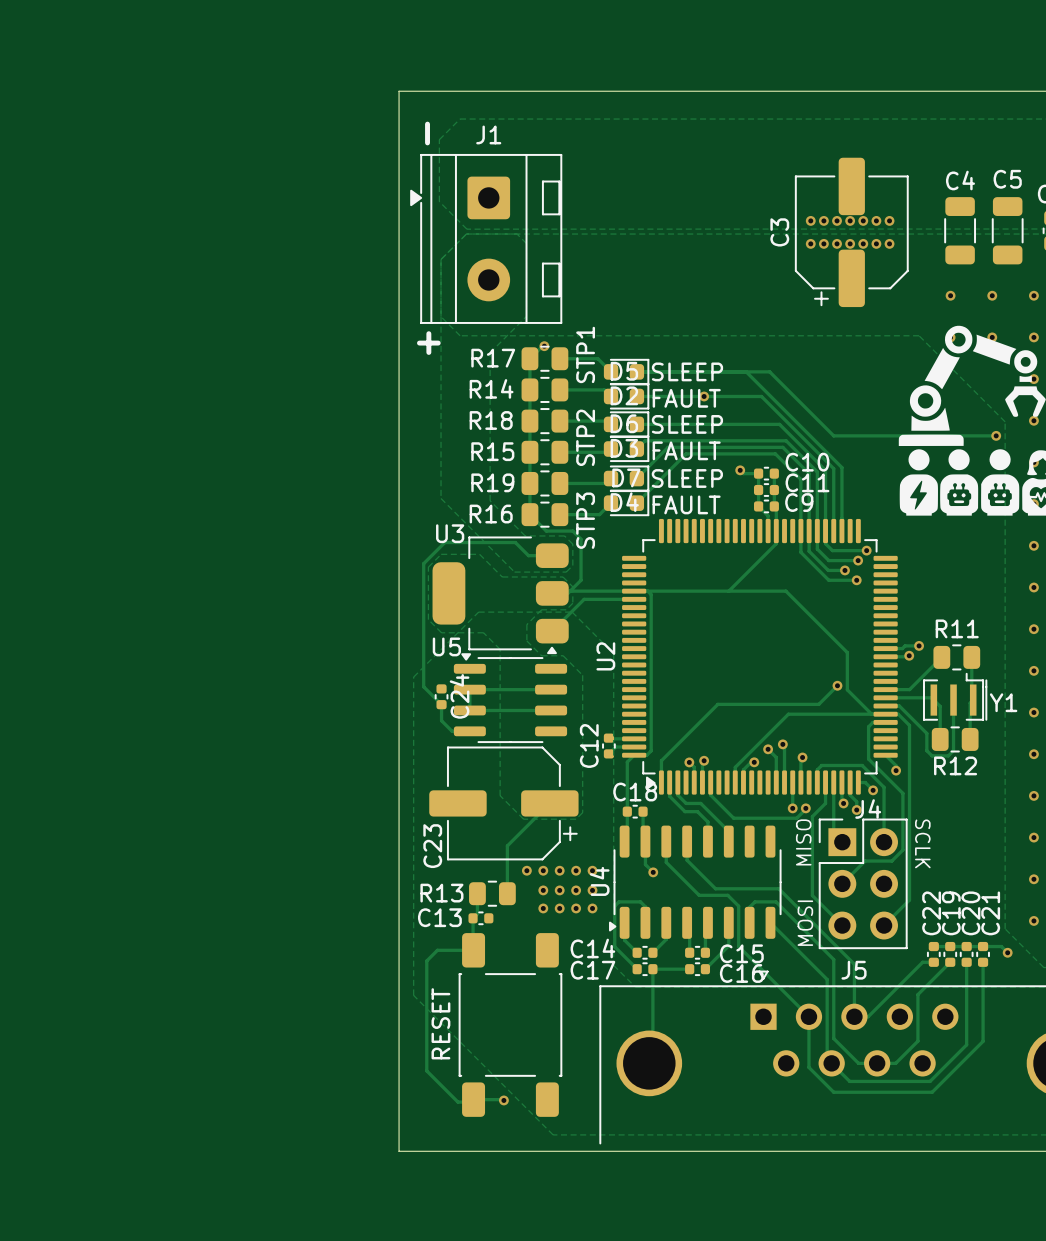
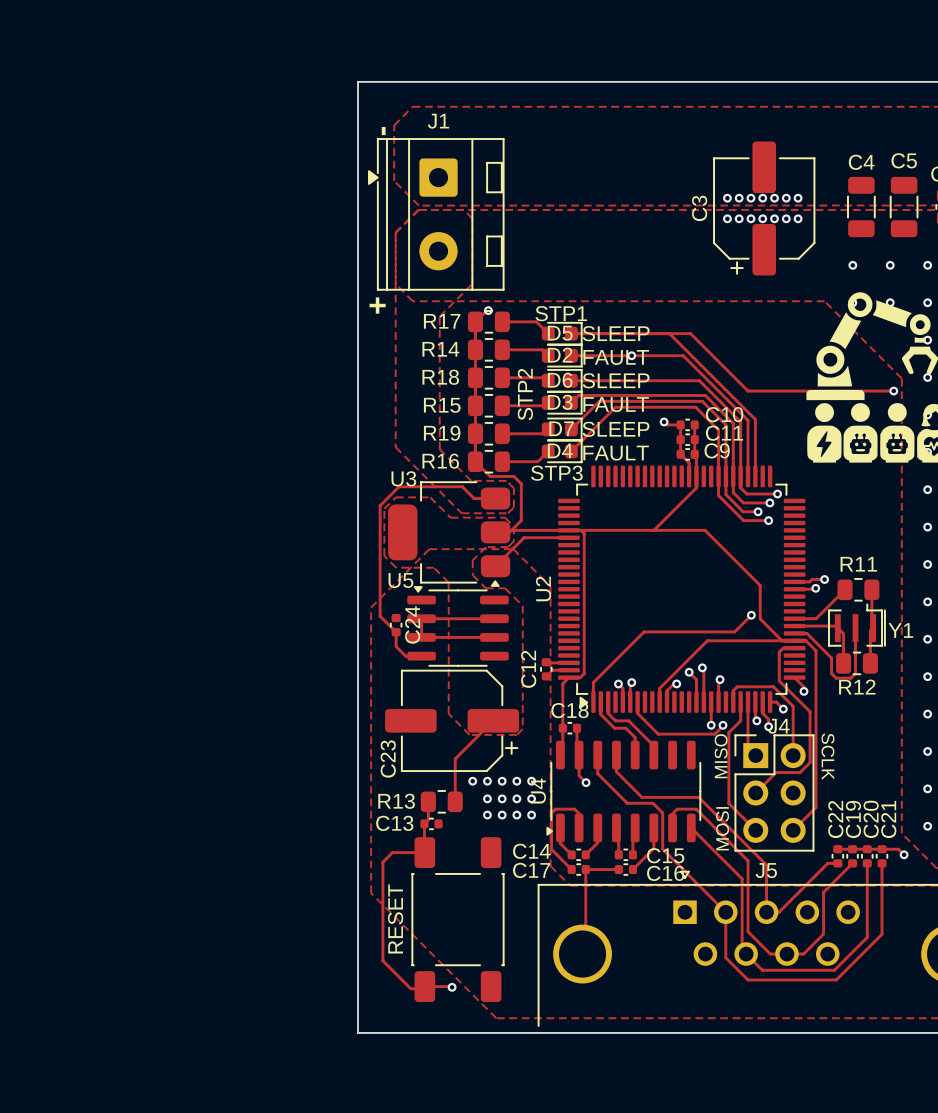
text rotation: 0° (585, 354) -> 90° clockwise (561, 313)
text rotation: 0° (585, 520) -> 90° clockwise (556, 473)

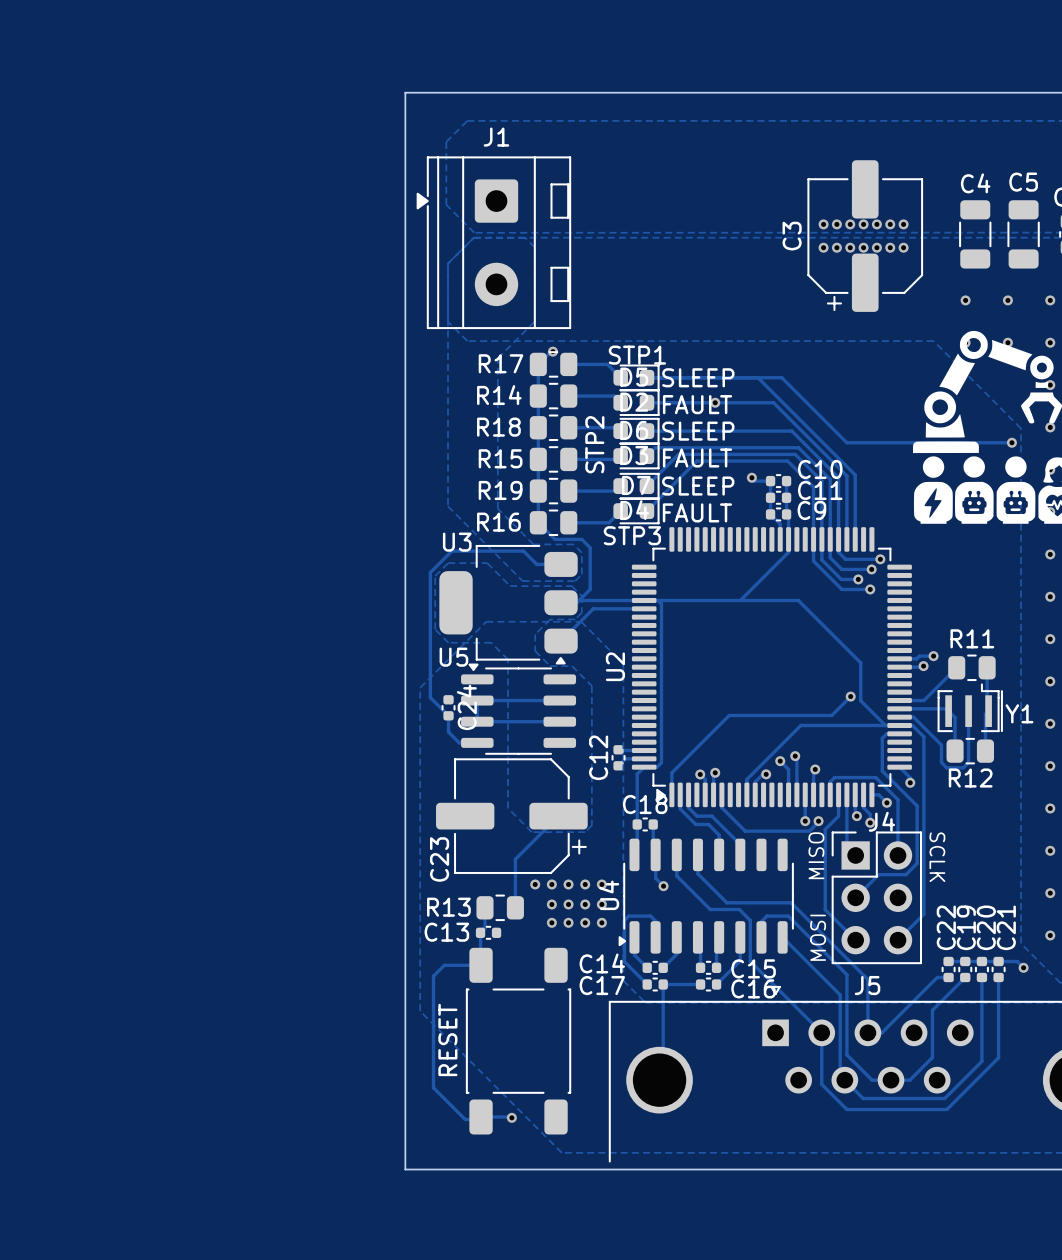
text: - (383, 131) -> none
text: + (377, 305) -> none

